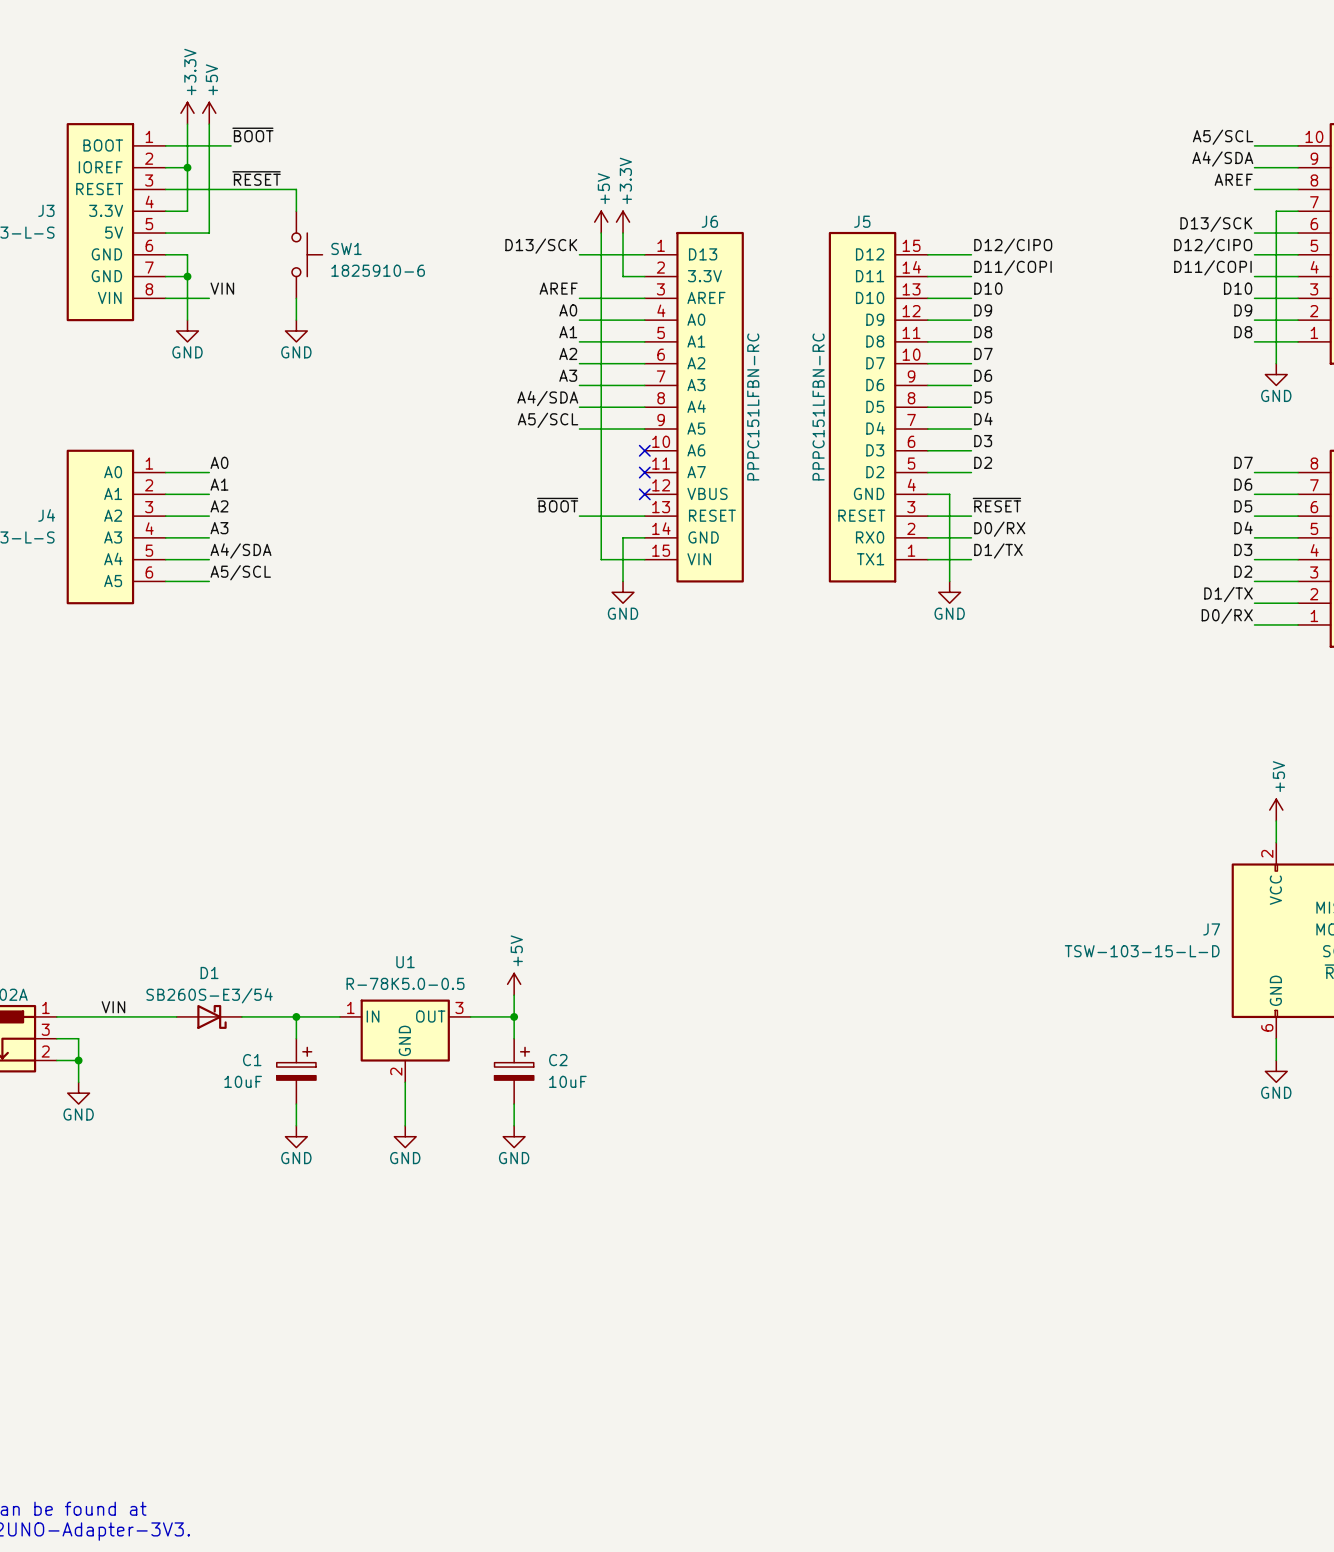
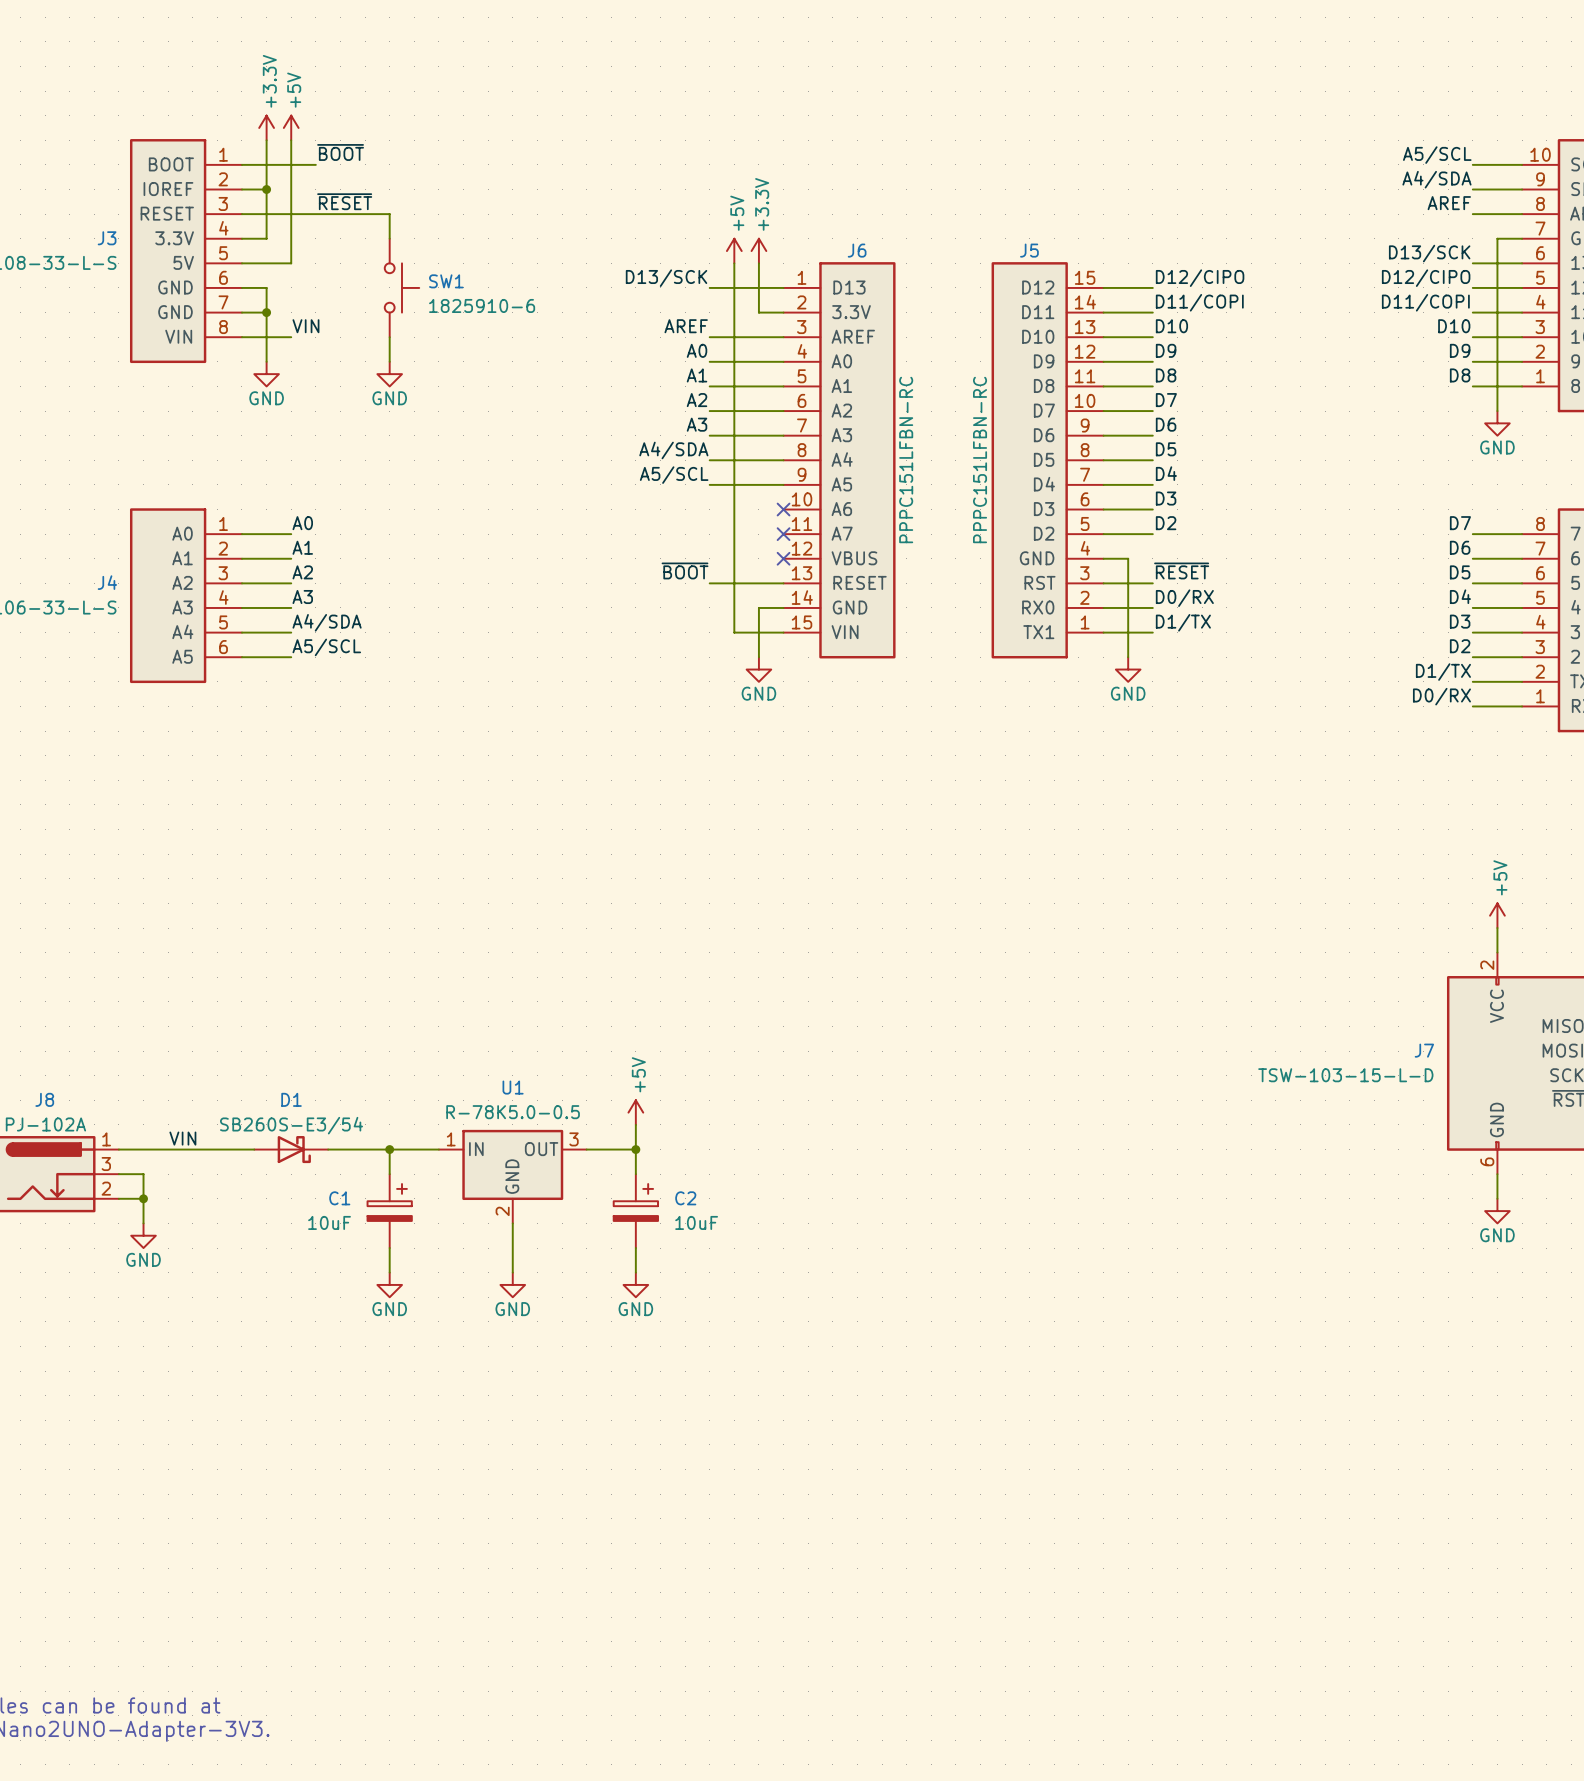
J5 pin name: RESET (861, 515) -> RST (1040, 582)

